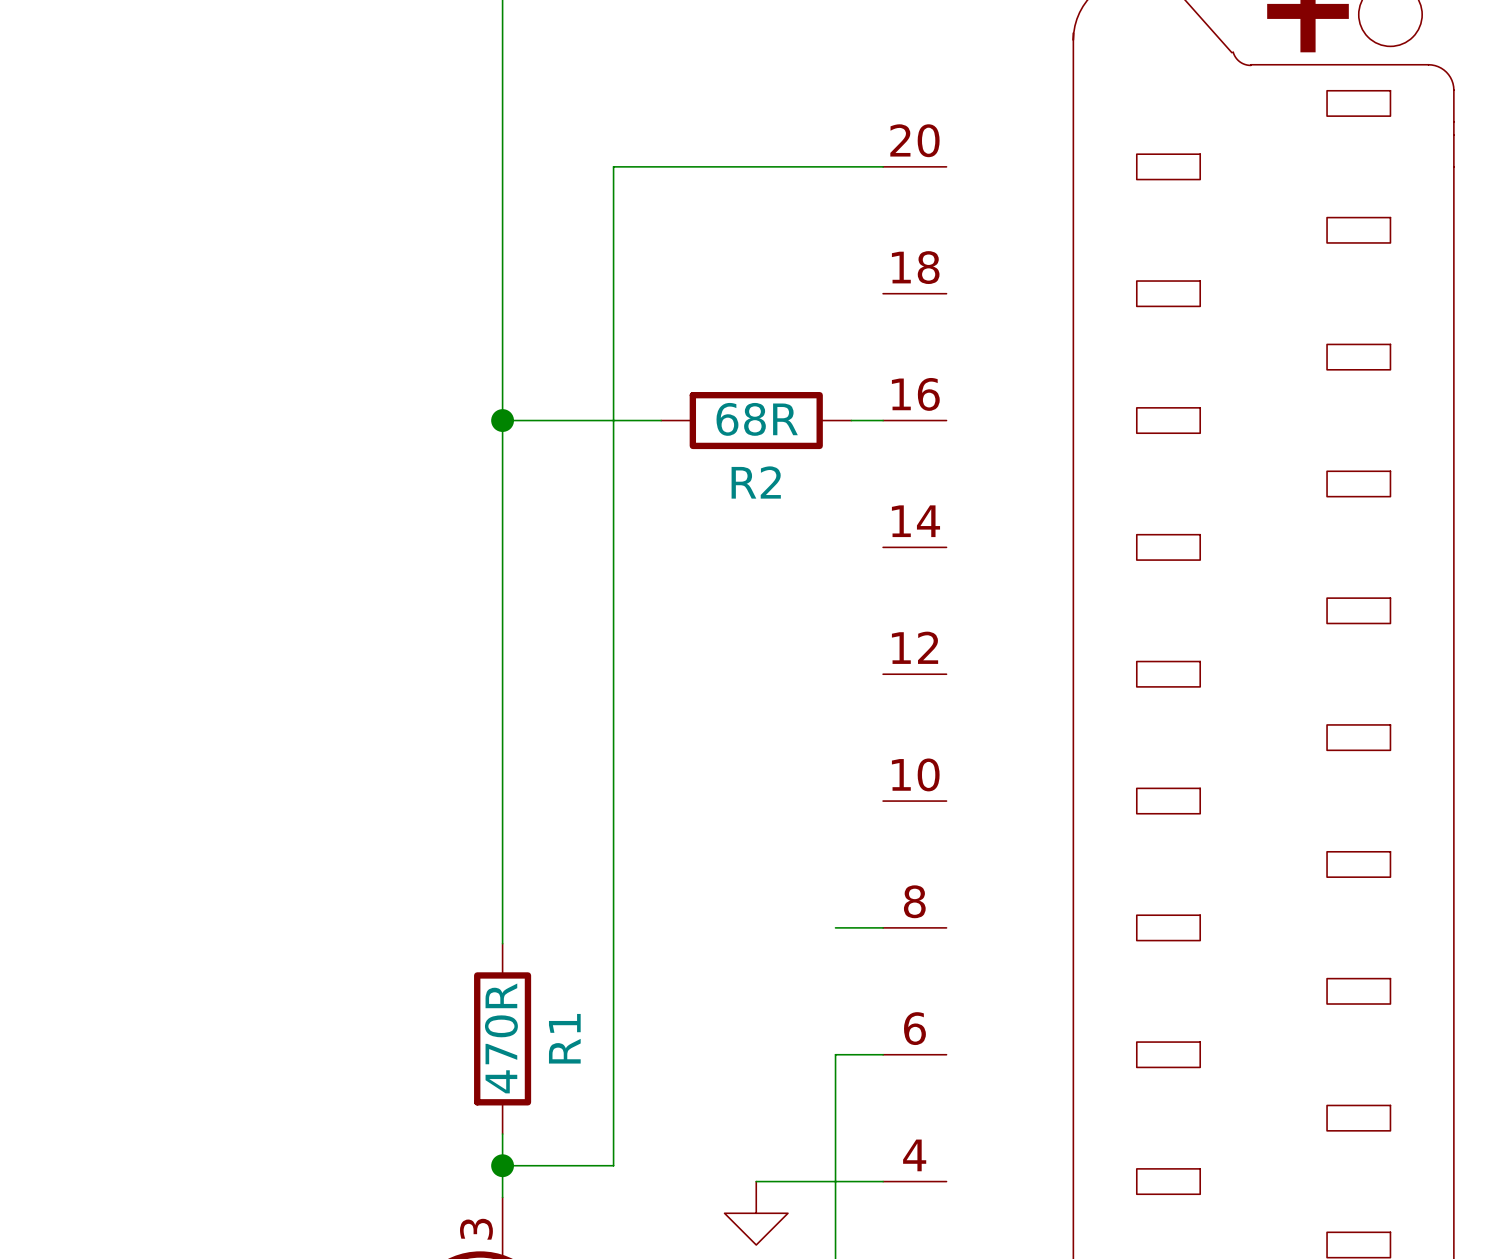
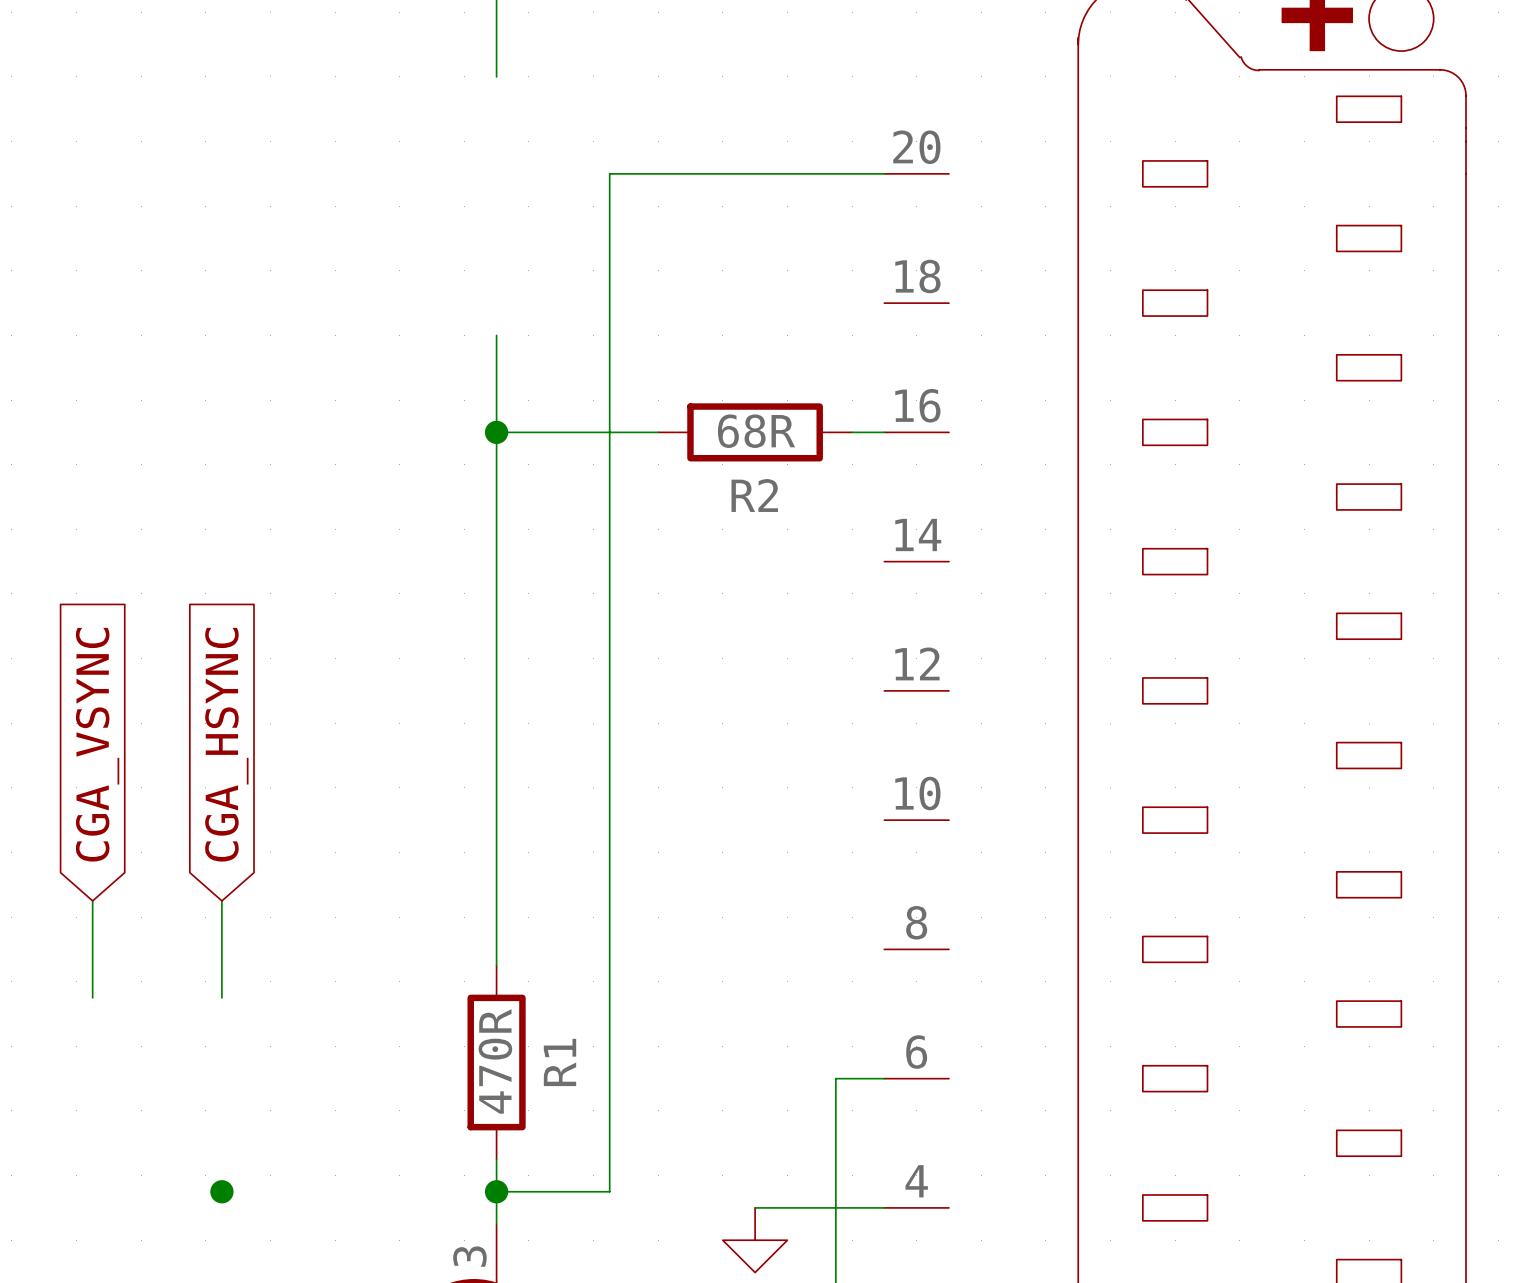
wire: (502, 71) (502, 325) -> none
global label: none -> CGA_HSYNC (226, 744)
global label: none -> CGA_VSYNC (97, 744)
wire: none -> (92, 900) (92, 997)
wire: none -> (221, 900) (221, 997)
wire: (835, 927) (883, 927) -> none
junction: none -> (221, 1191)

